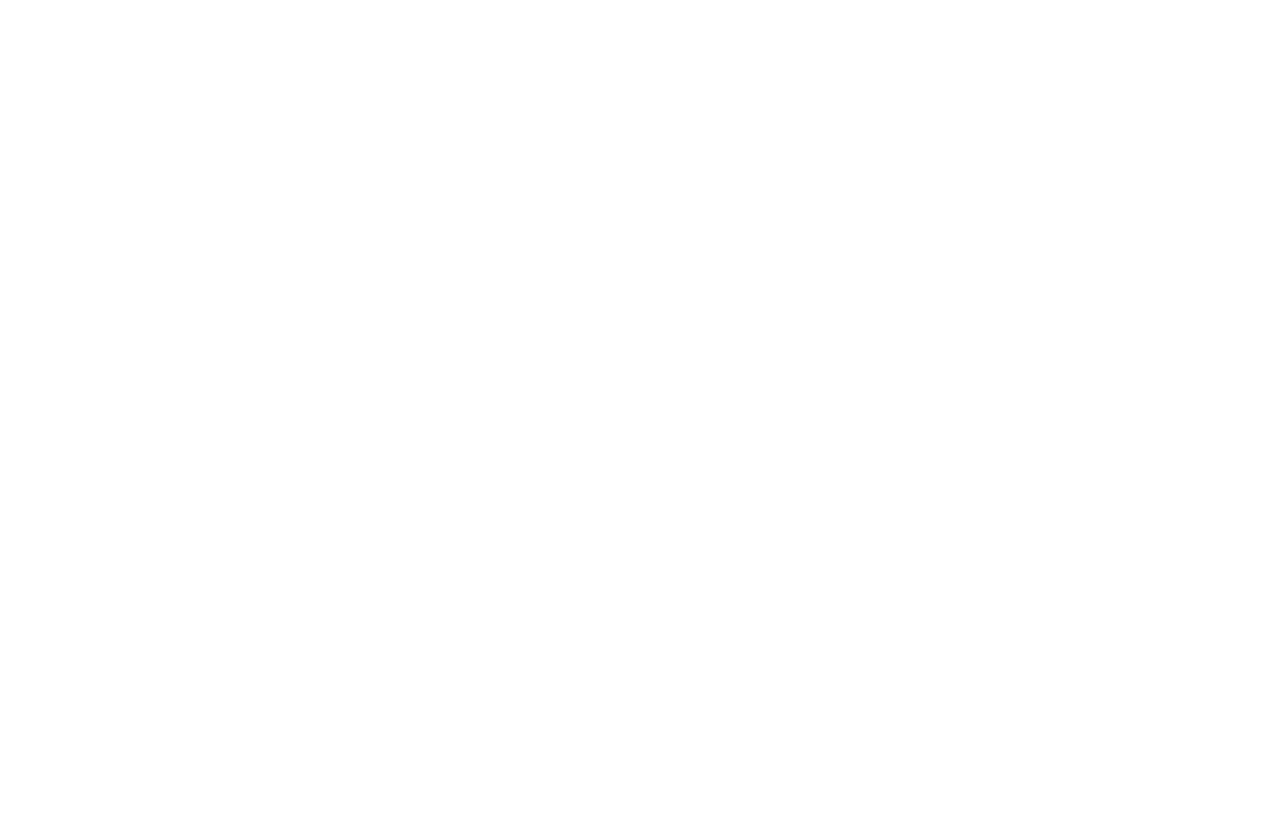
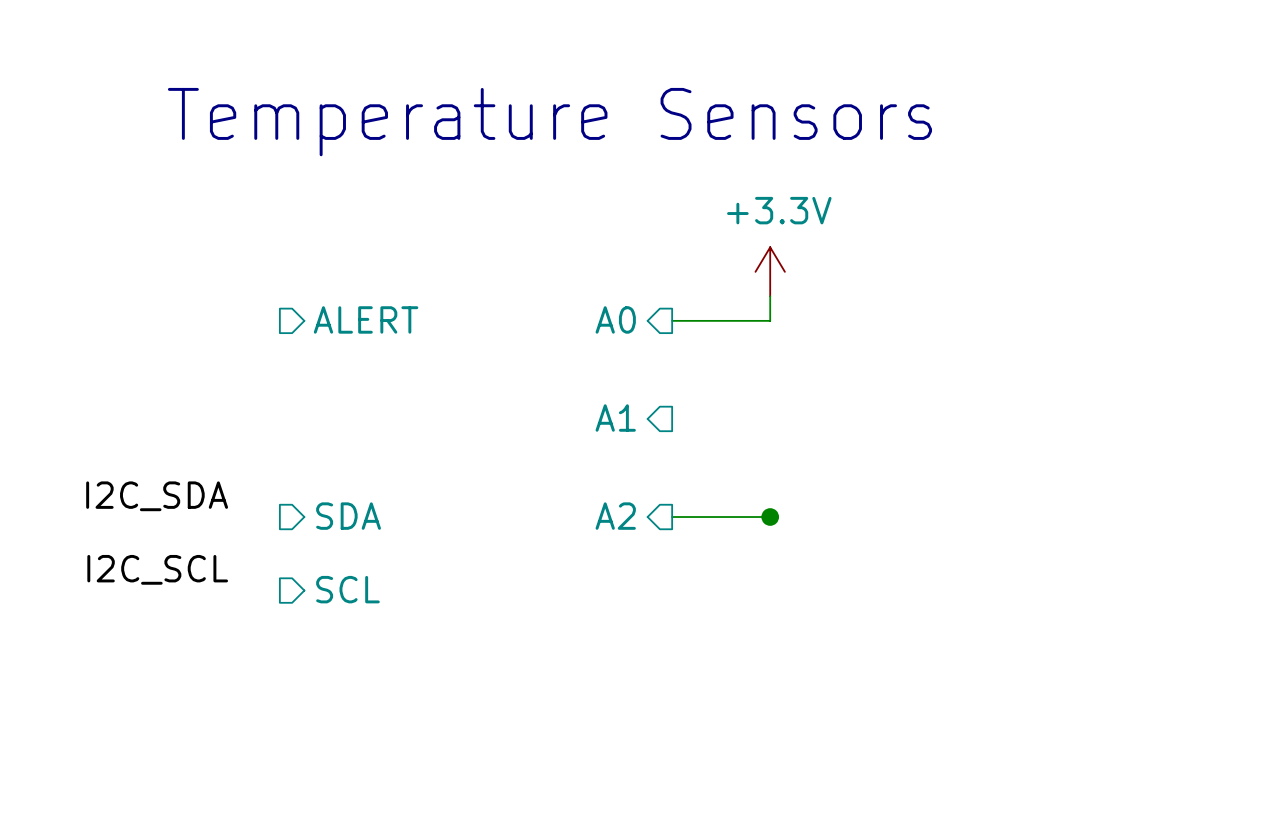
text: none -> Temperature Sensors (549, 122)
power symbol: none -> +3.3V (770, 271)
wire: none -> (770, 296) (770, 320) (672, 320)
sheet pin: none -> ALERT (366, 319)
sheet pin: none -> A0 (615, 319)
sheet pin: none -> A1 (615, 418)
label: none -> I2C_SDA (157, 496)
sheet pin: none -> SDA (348, 516)
sheet pin: none -> A2 (615, 516)
wire: none -> (672, 517) (770, 517)
junction: none -> (770, 517)
label: none -> I2C_SCL (157, 569)
sheet pin: none -> SCL (347, 589)

